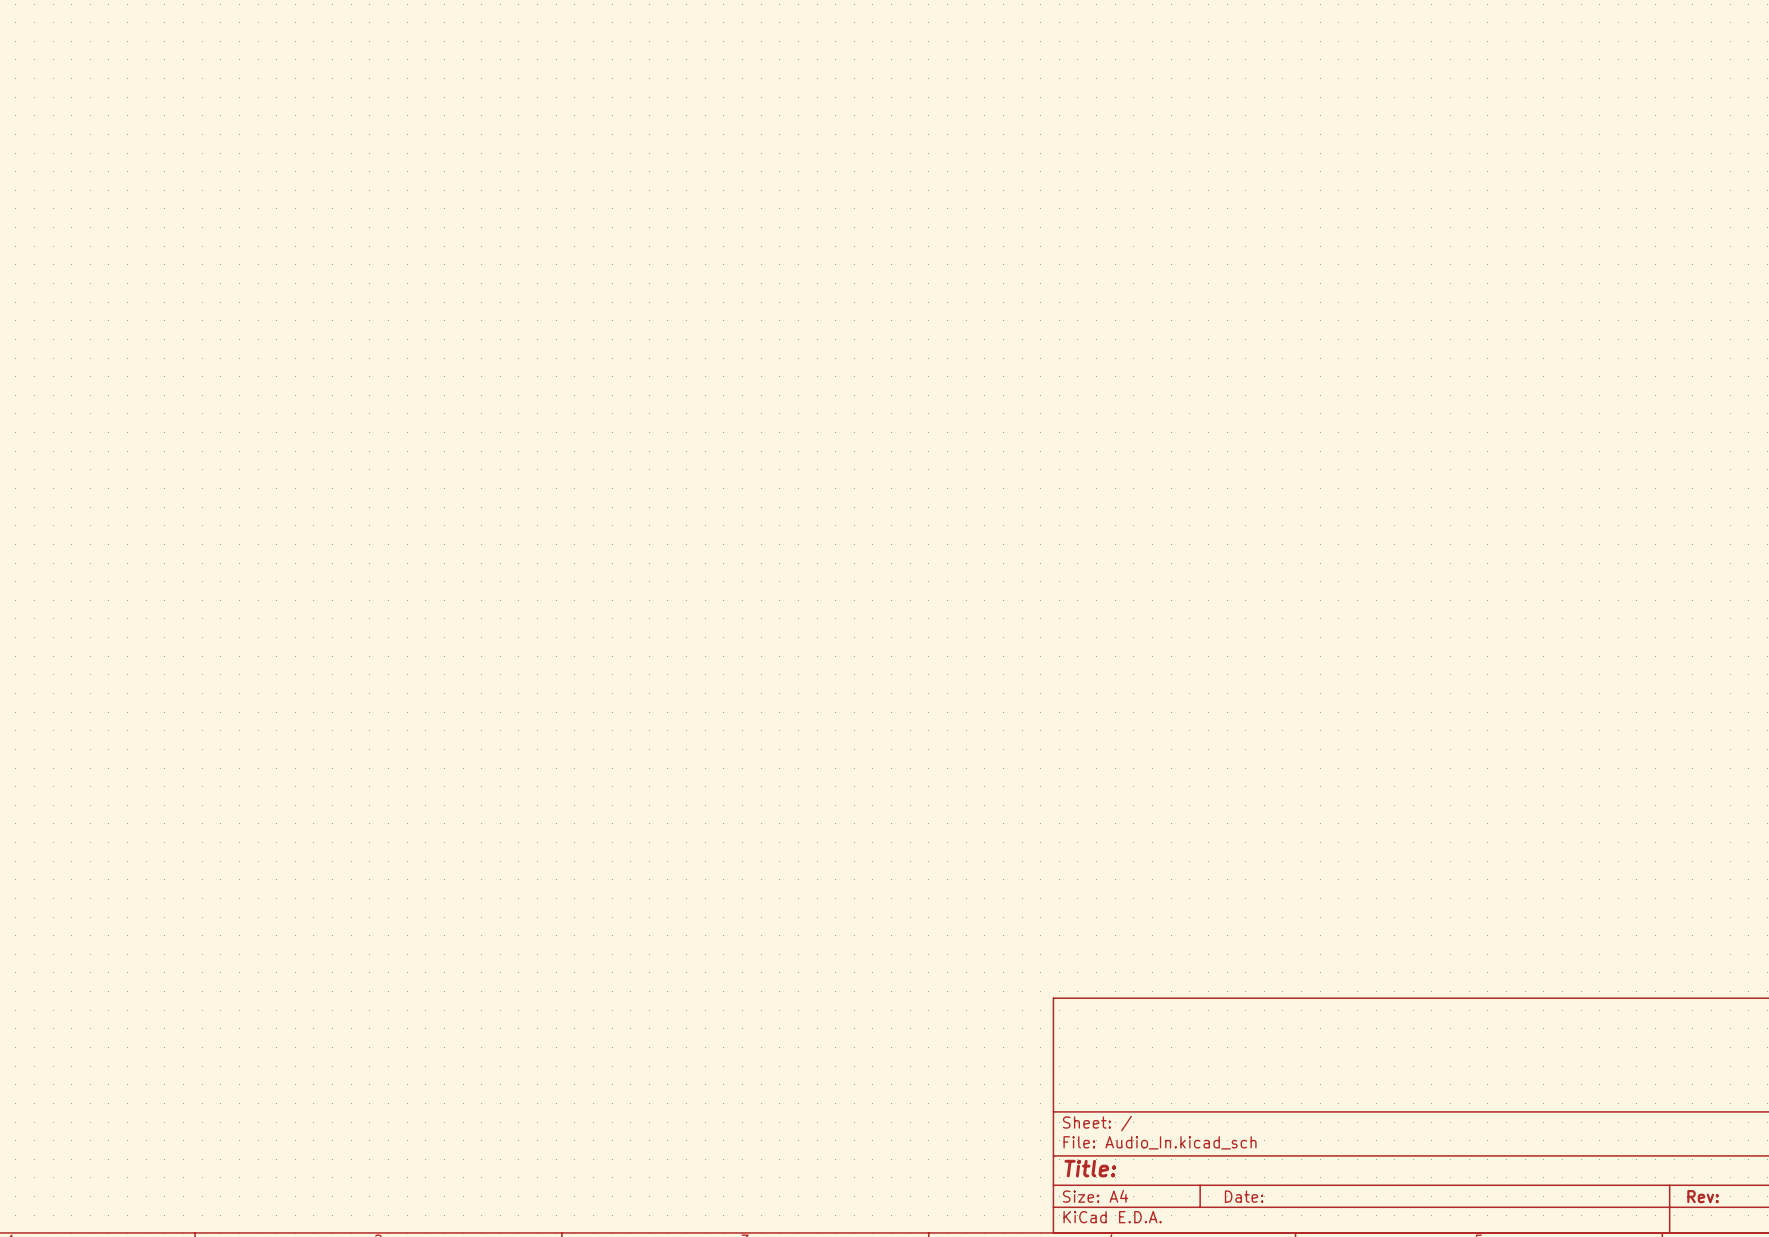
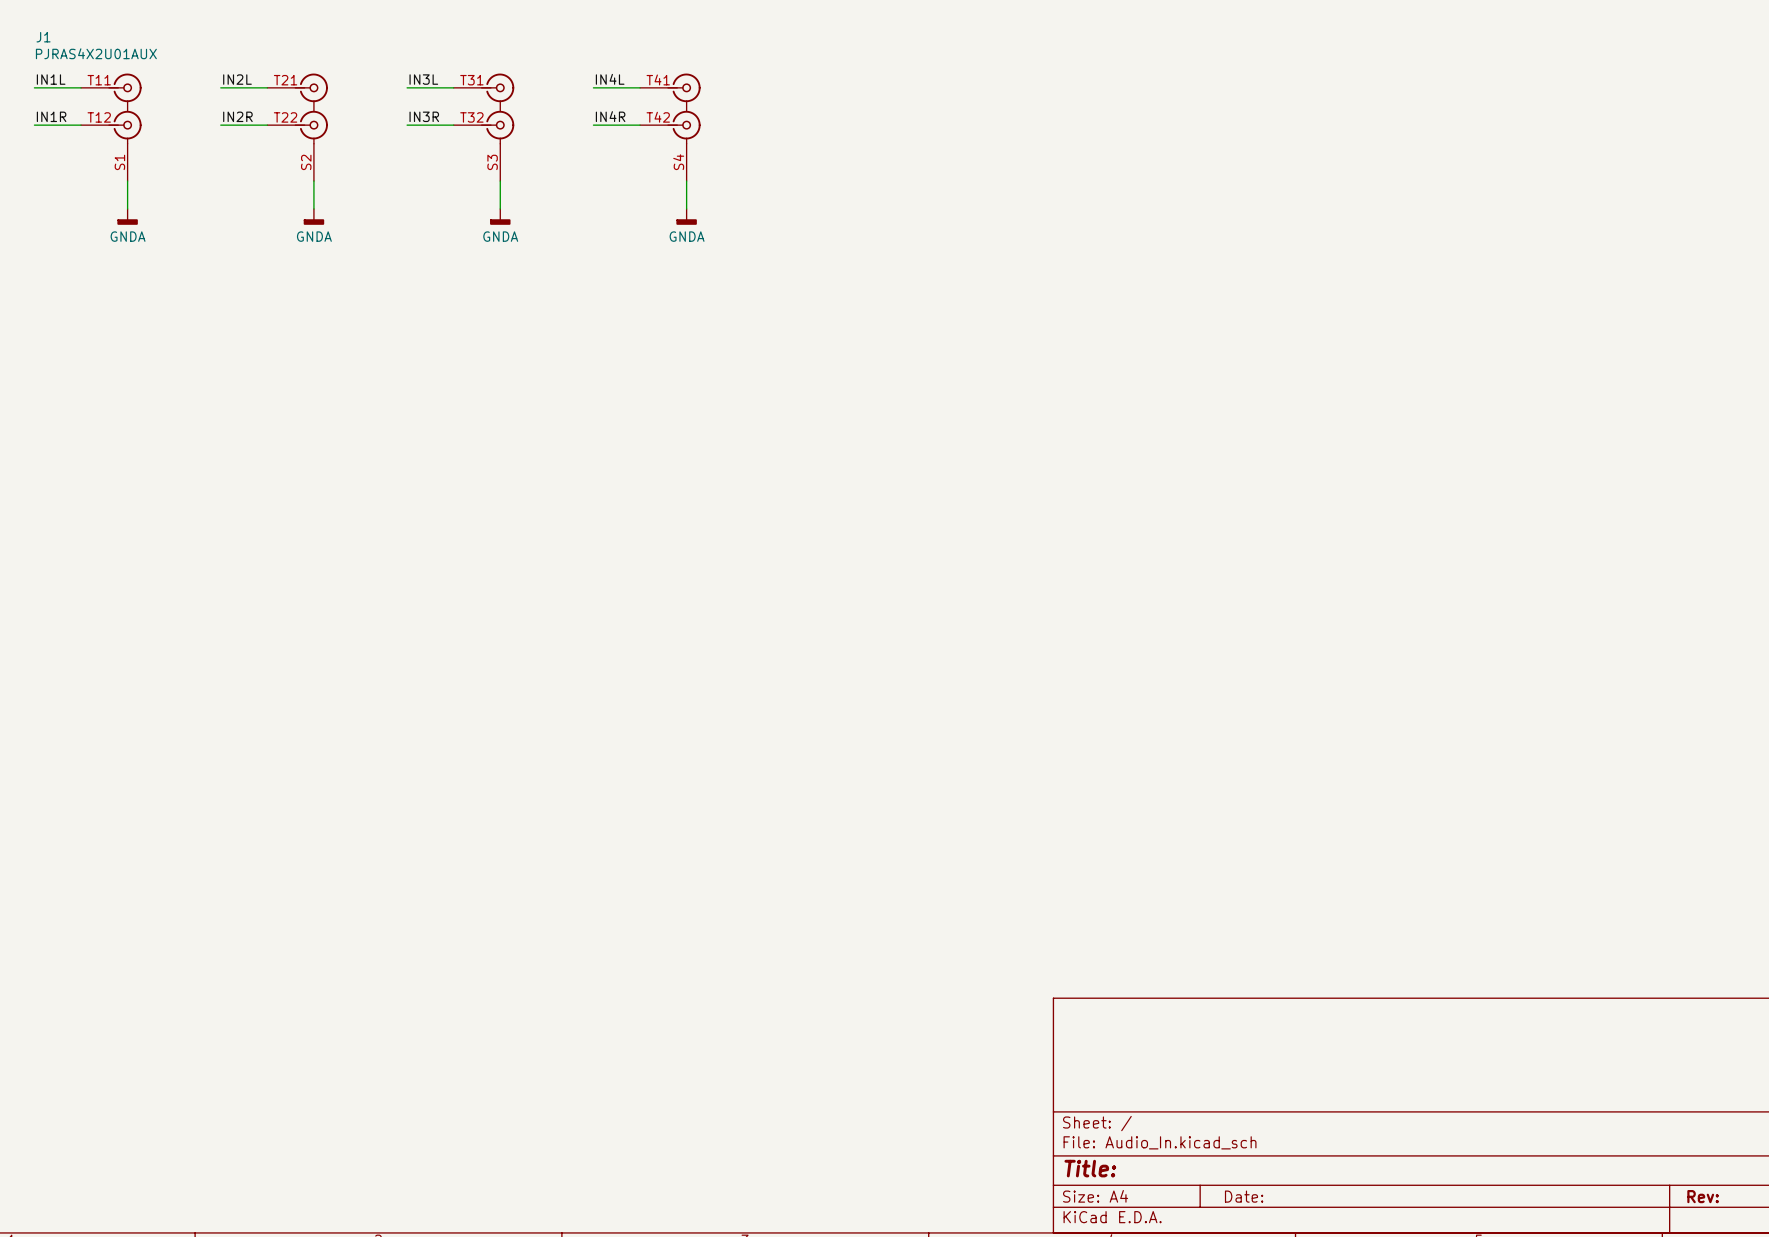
label: none -> IN1L (51, 79)
label: none -> IN2L (237, 79)
label: none -> IN3L (423, 79)
label: none -> IN4L (610, 79)
wire: none -> (34, 87) (81, 87)
wire: none -> (220, 87) (267, 87)
wire: none -> (407, 87) (453, 87)
wire: none -> (593, 87) (640, 87)
label: none -> IN1R (51, 116)
label: none -> IN2R (237, 116)
label: none -> IN3R (424, 116)
label: none -> IN4R (610, 116)
wire: none -> (34, 125) (81, 125)
wire: none -> (220, 125) (267, 125)
wire: none -> (407, 125) (453, 125)
wire: none -> (593, 125) (640, 125)
J1: none -> PJRAS4X2U01AUX (390, 127)
wire: none -> (127, 181) (127, 208)
wire: none -> (313, 181) (313, 208)
wire: none -> (500, 181) (500, 208)
wire: none -> (686, 181) (686, 208)
power symbol: none -> GNDA (127, 216)
power symbol: none -> GNDA (313, 216)
power symbol: none -> GNDA (500, 216)
power symbol: none -> GNDA (686, 216)

